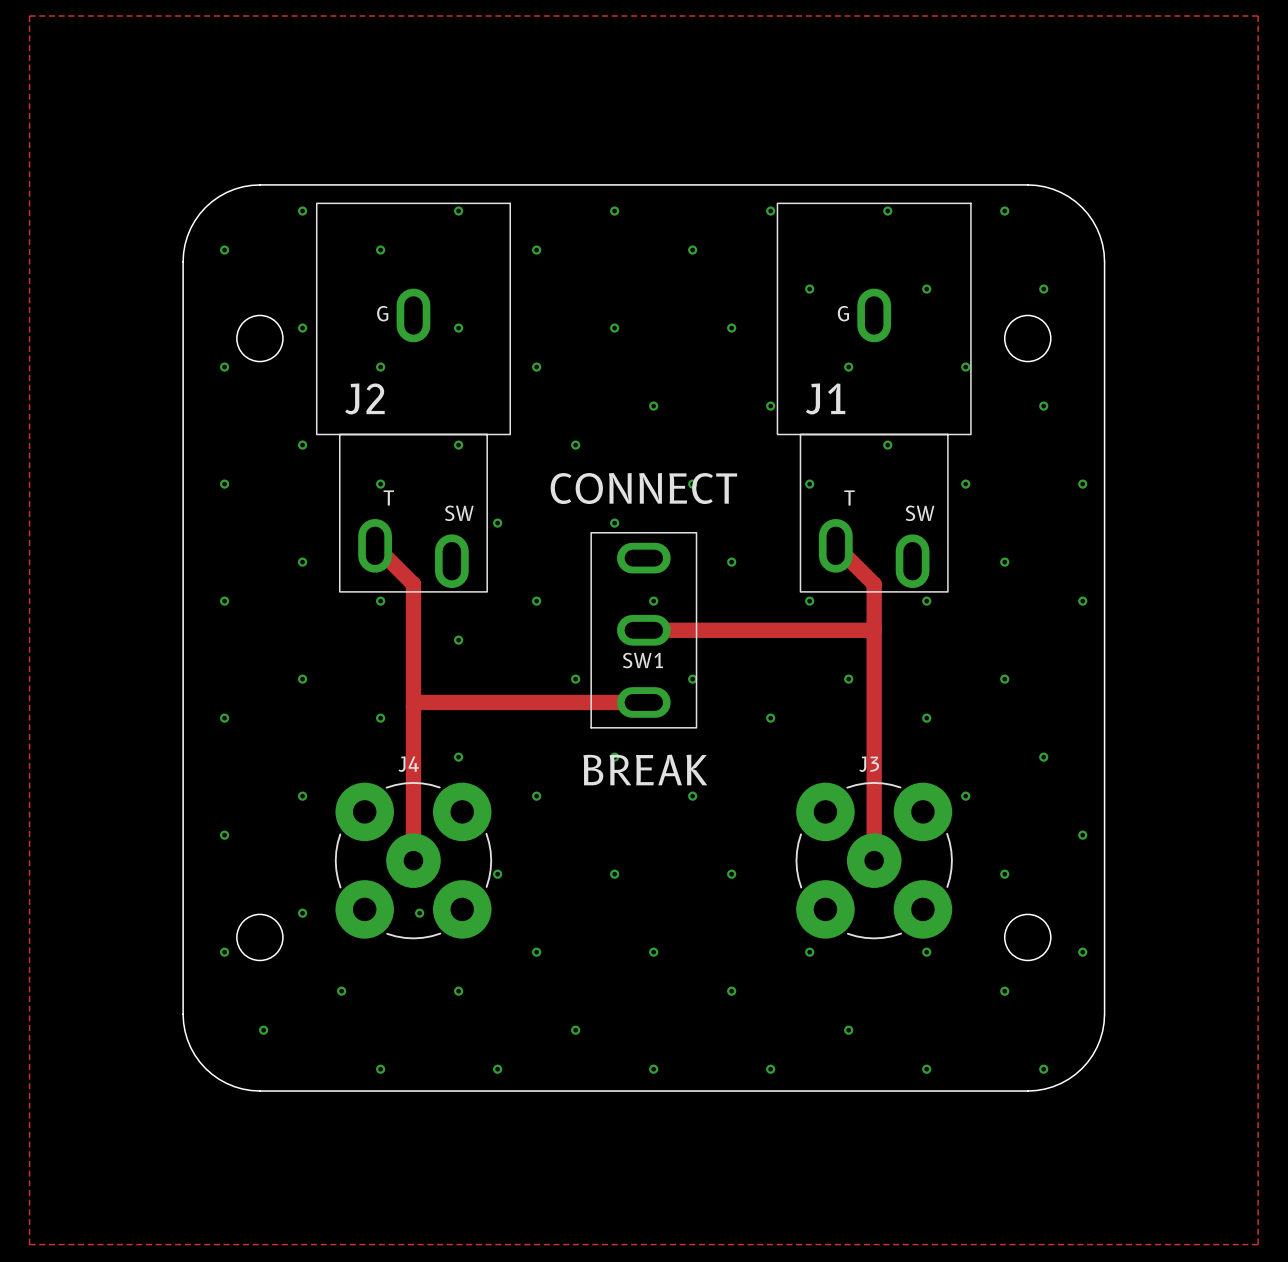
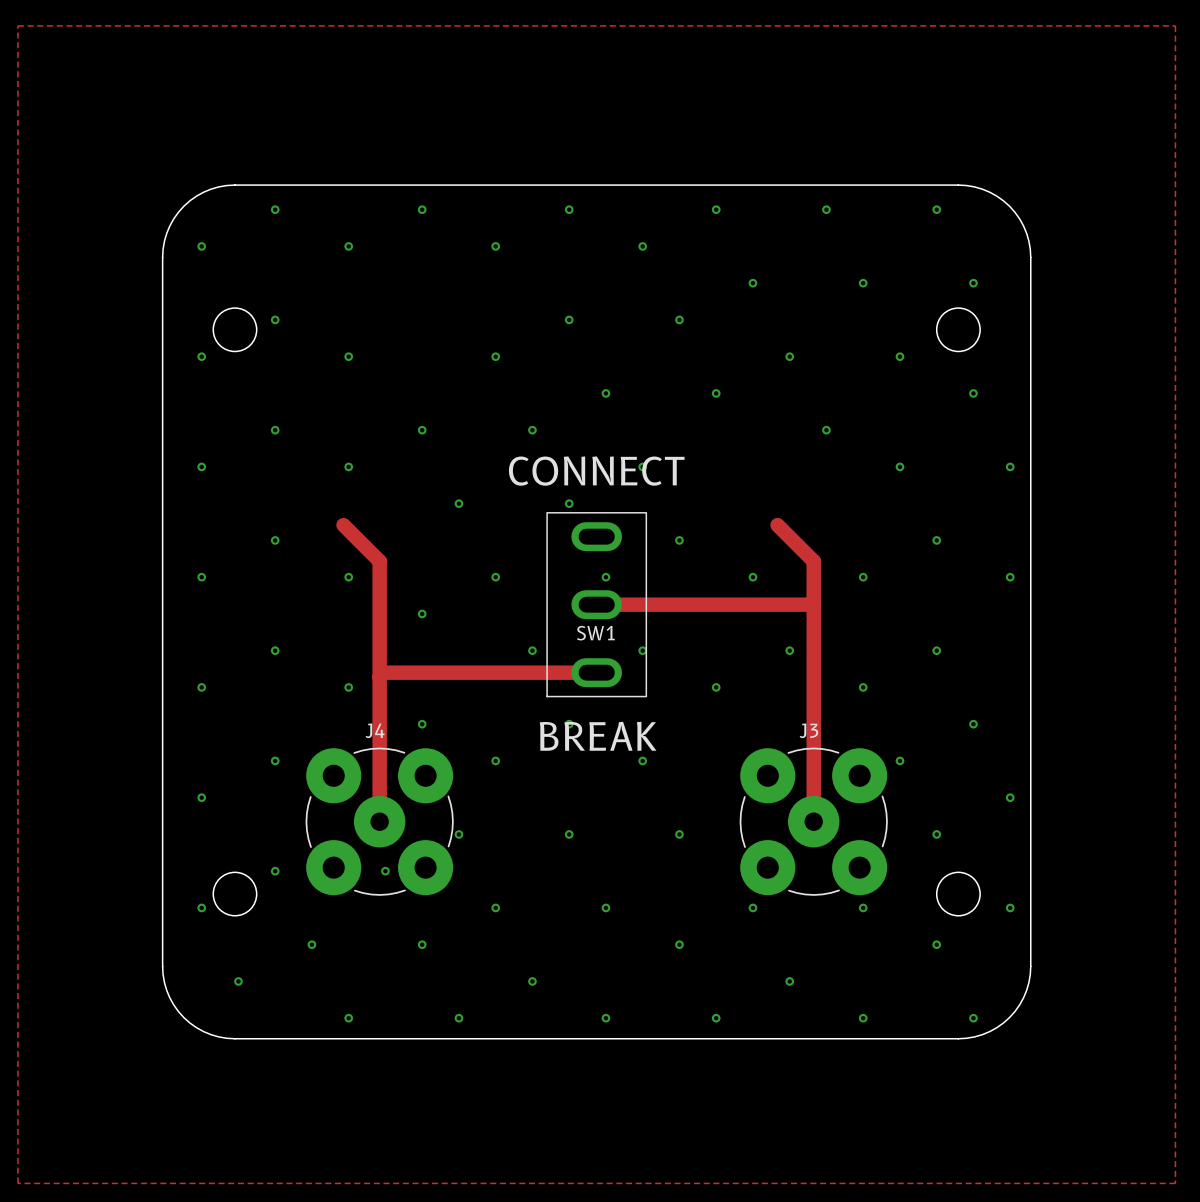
via: (458, 328) -> none
J2: (413, 397) -> none
J1: (874, 397) -> none
via: (809, 484) -> none

